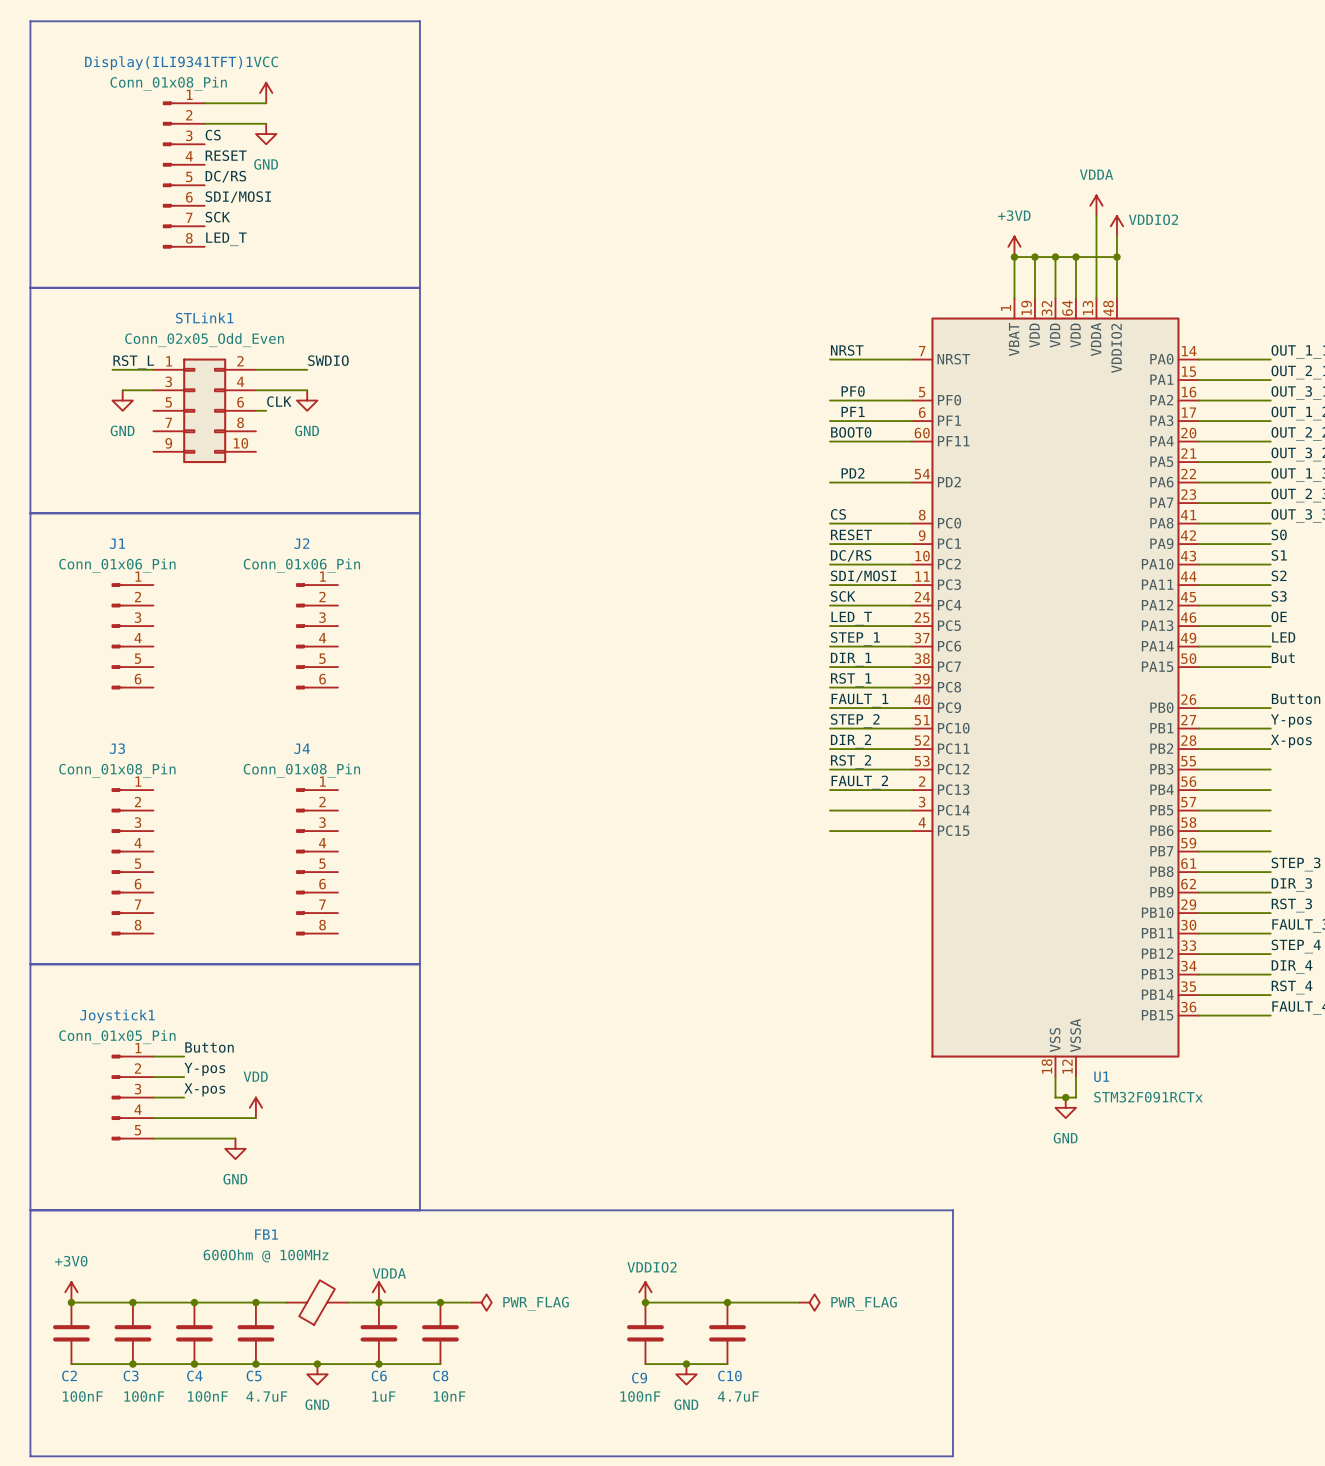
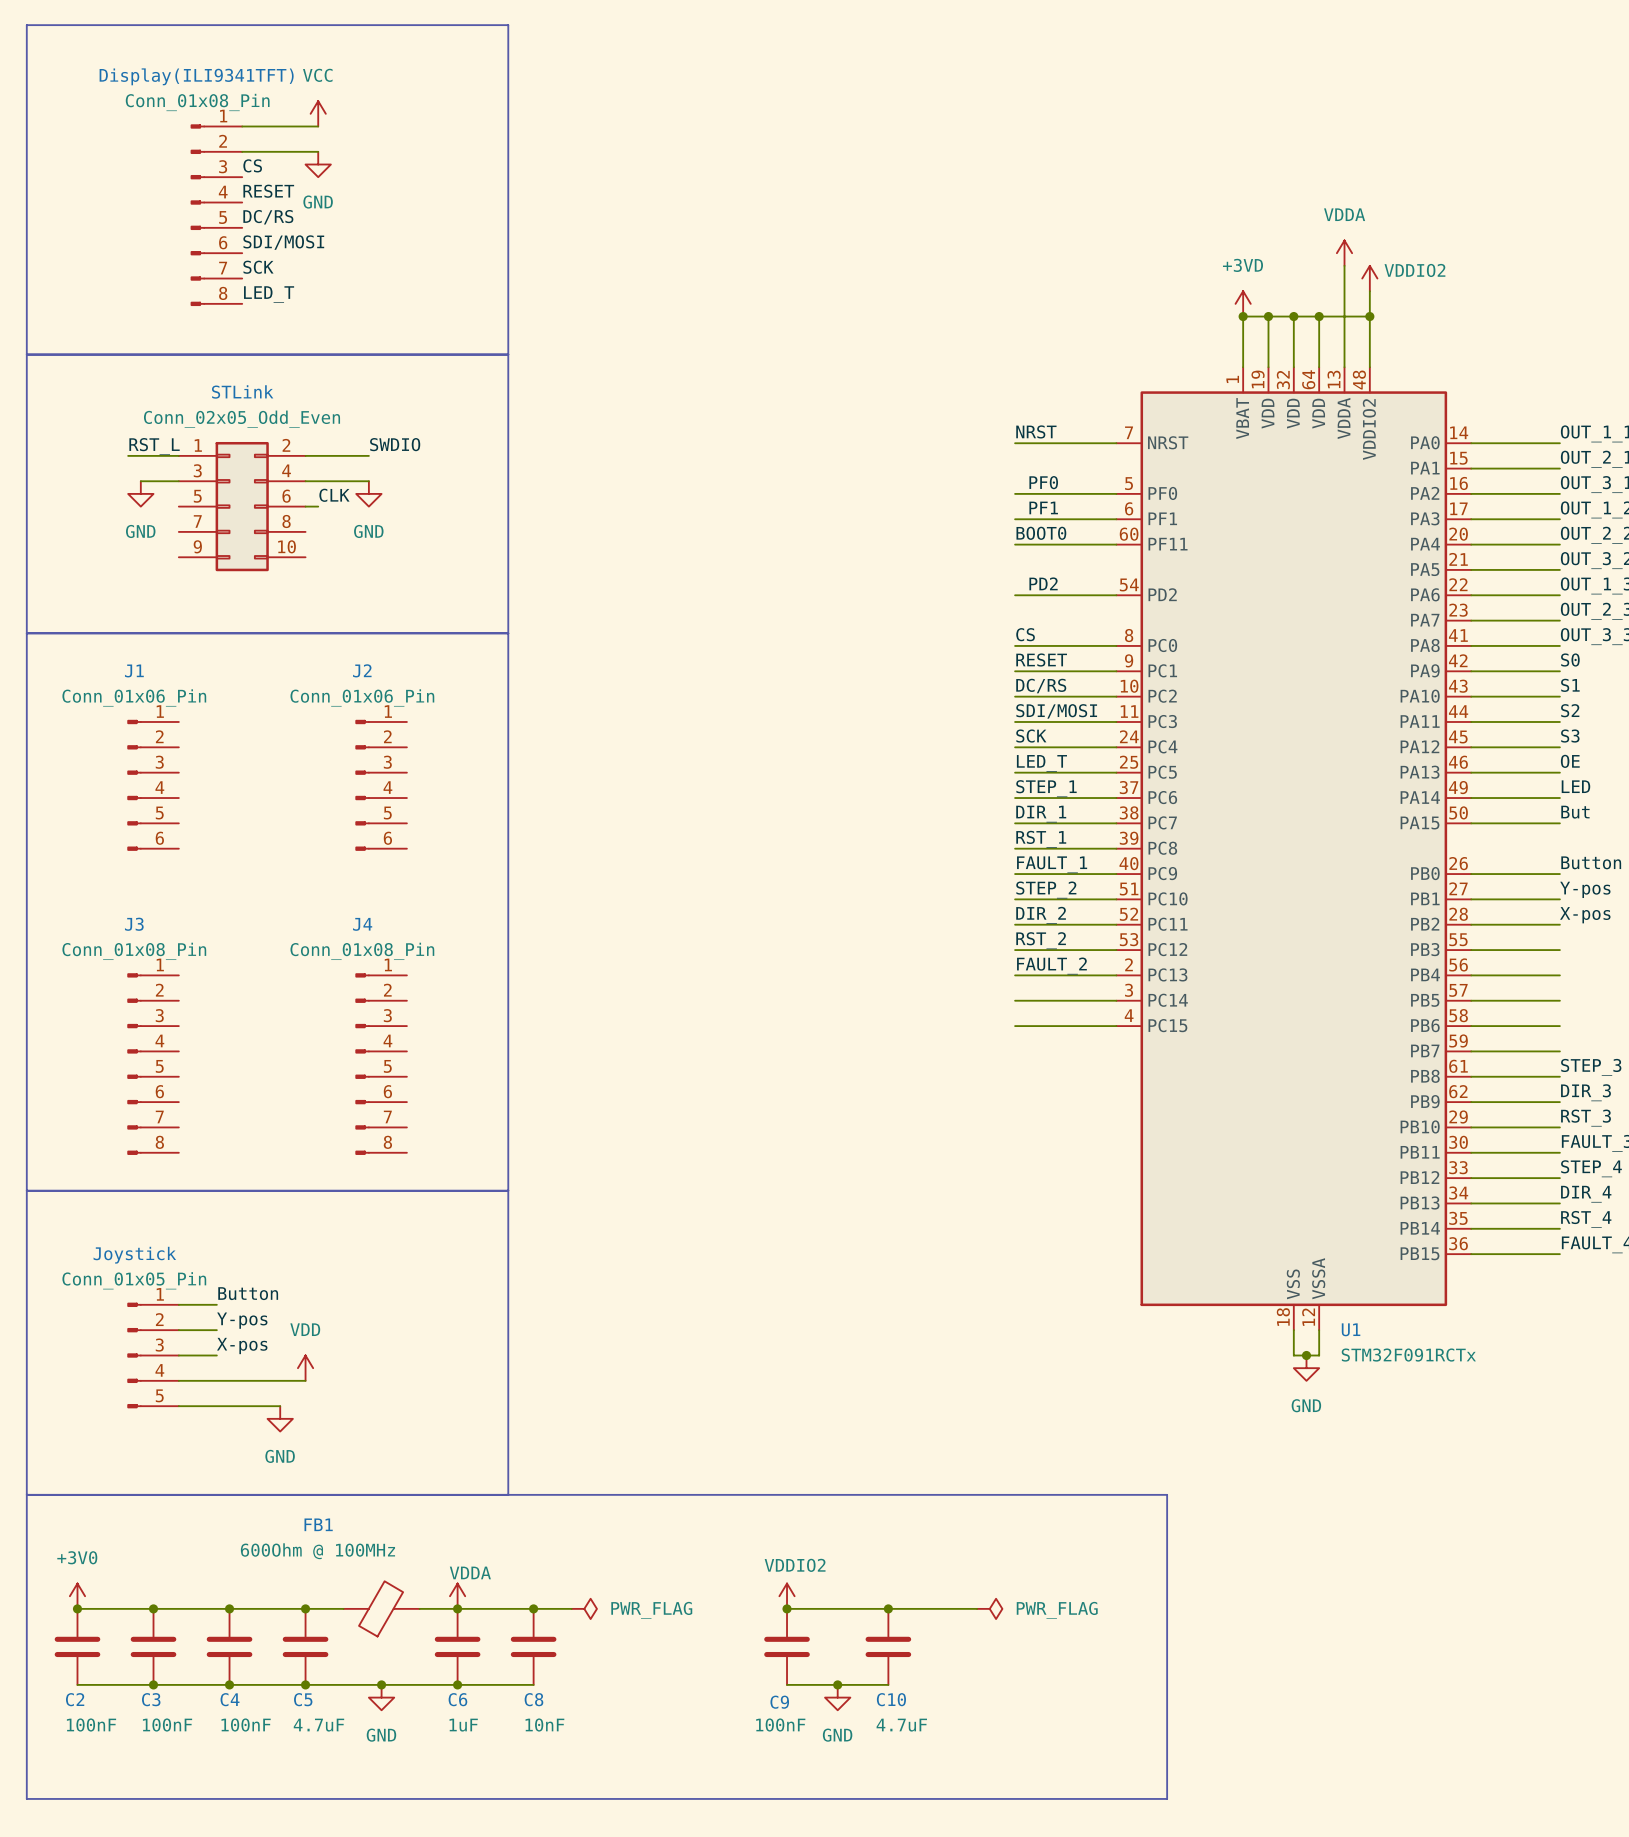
Display(ILI9341TFT)1 name: Display(ILI9341TFT)1 (168, 63) -> Display(ILI9341TFT) (196, 76)
STLink1 name: STLink1 (204, 318) -> STLink (242, 391)
Joystick1 name: Joystick1 (117, 1016) -> Joystick (134, 1255)

